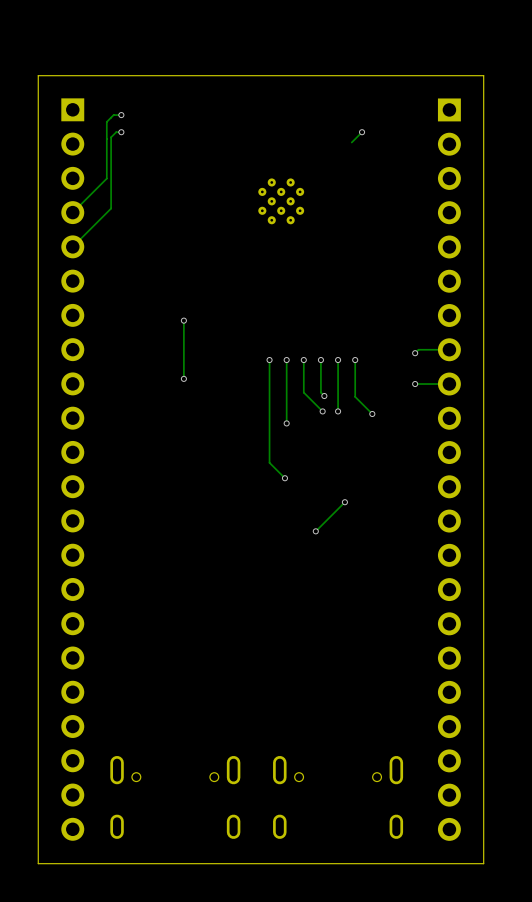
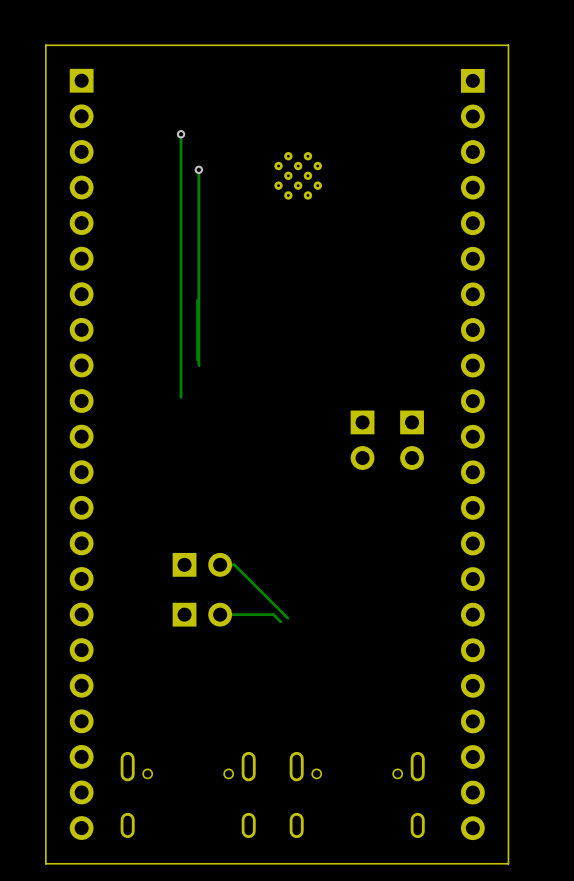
track: (121, 115) (113, 115) (106, 121) (106, 178) (72, 212) -> none
via: (121, 115) -> none
track: (121, 132) (116, 132) (111, 137) (111, 208) (72, 246) -> none
via: (121, 132) -> none
track: (362, 132) (351, 142) -> none
via: (362, 132) -> none
track: none -> (181, 134) (181, 397)
via: none -> (181, 134)
track: none -> (198, 169) (198, 365)
via: none -> (198, 169)
via: (183, 320) -> none
track: (449, 349) (418, 349) (415, 353) -> none
via: (415, 353) -> none
track: (269, 360) (269, 462) (284, 478) -> none
via: (269, 360) -> none
track: (286, 360) (286, 423) -> none
via: (286, 360) -> none
track: (303, 360) (303, 392) (322, 411) -> none
via: (303, 360) -> none
track: (320, 360) (320, 392) (324, 396) -> none
via: (320, 360) -> none
track: (338, 360) (338, 411) -> none
via: (338, 360) -> none
track: (355, 360) (355, 396) (372, 413) -> none
via: (355, 360) -> none
via: (183, 378) -> none
via: (415, 384) -> none
track: (449, 384) (415, 384) -> none
via: (324, 396) -> none
via: (322, 411) -> none
via: (338, 411) -> none
via: (372, 413) -> none
via: (286, 423) -> none
part: none -> (362, 440)
part: none -> (412, 440)
via: (284, 478) -> none
track: (344, 502) (315, 531) -> none
via: (344, 502) -> none
via: (315, 531) -> none
part: none -> (202, 564)
track: none -> (220, 564) (234, 564) (287, 618)
part: none -> (202, 614)
track: none -> (220, 614) (273, 614) (280, 621)

